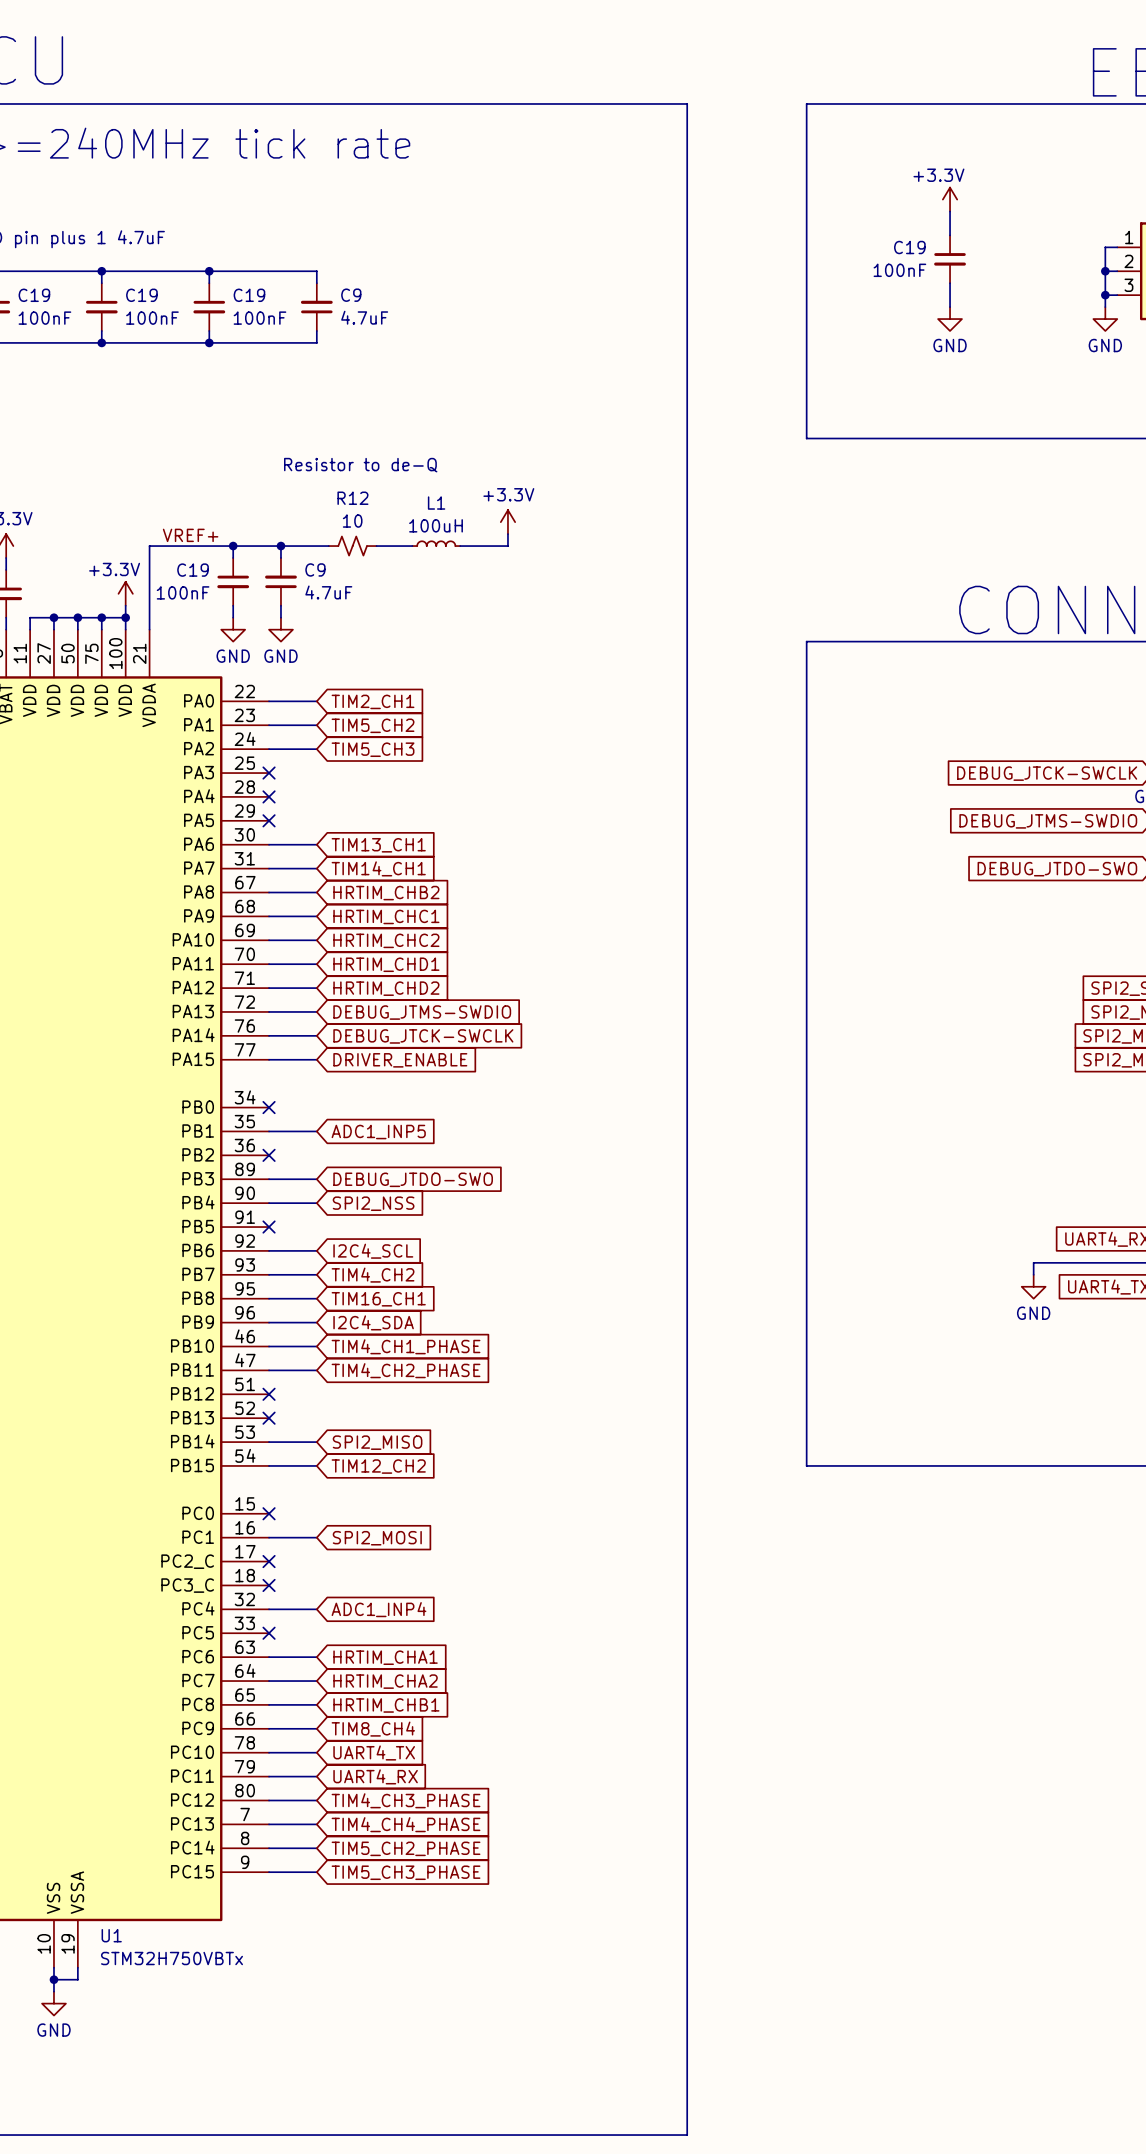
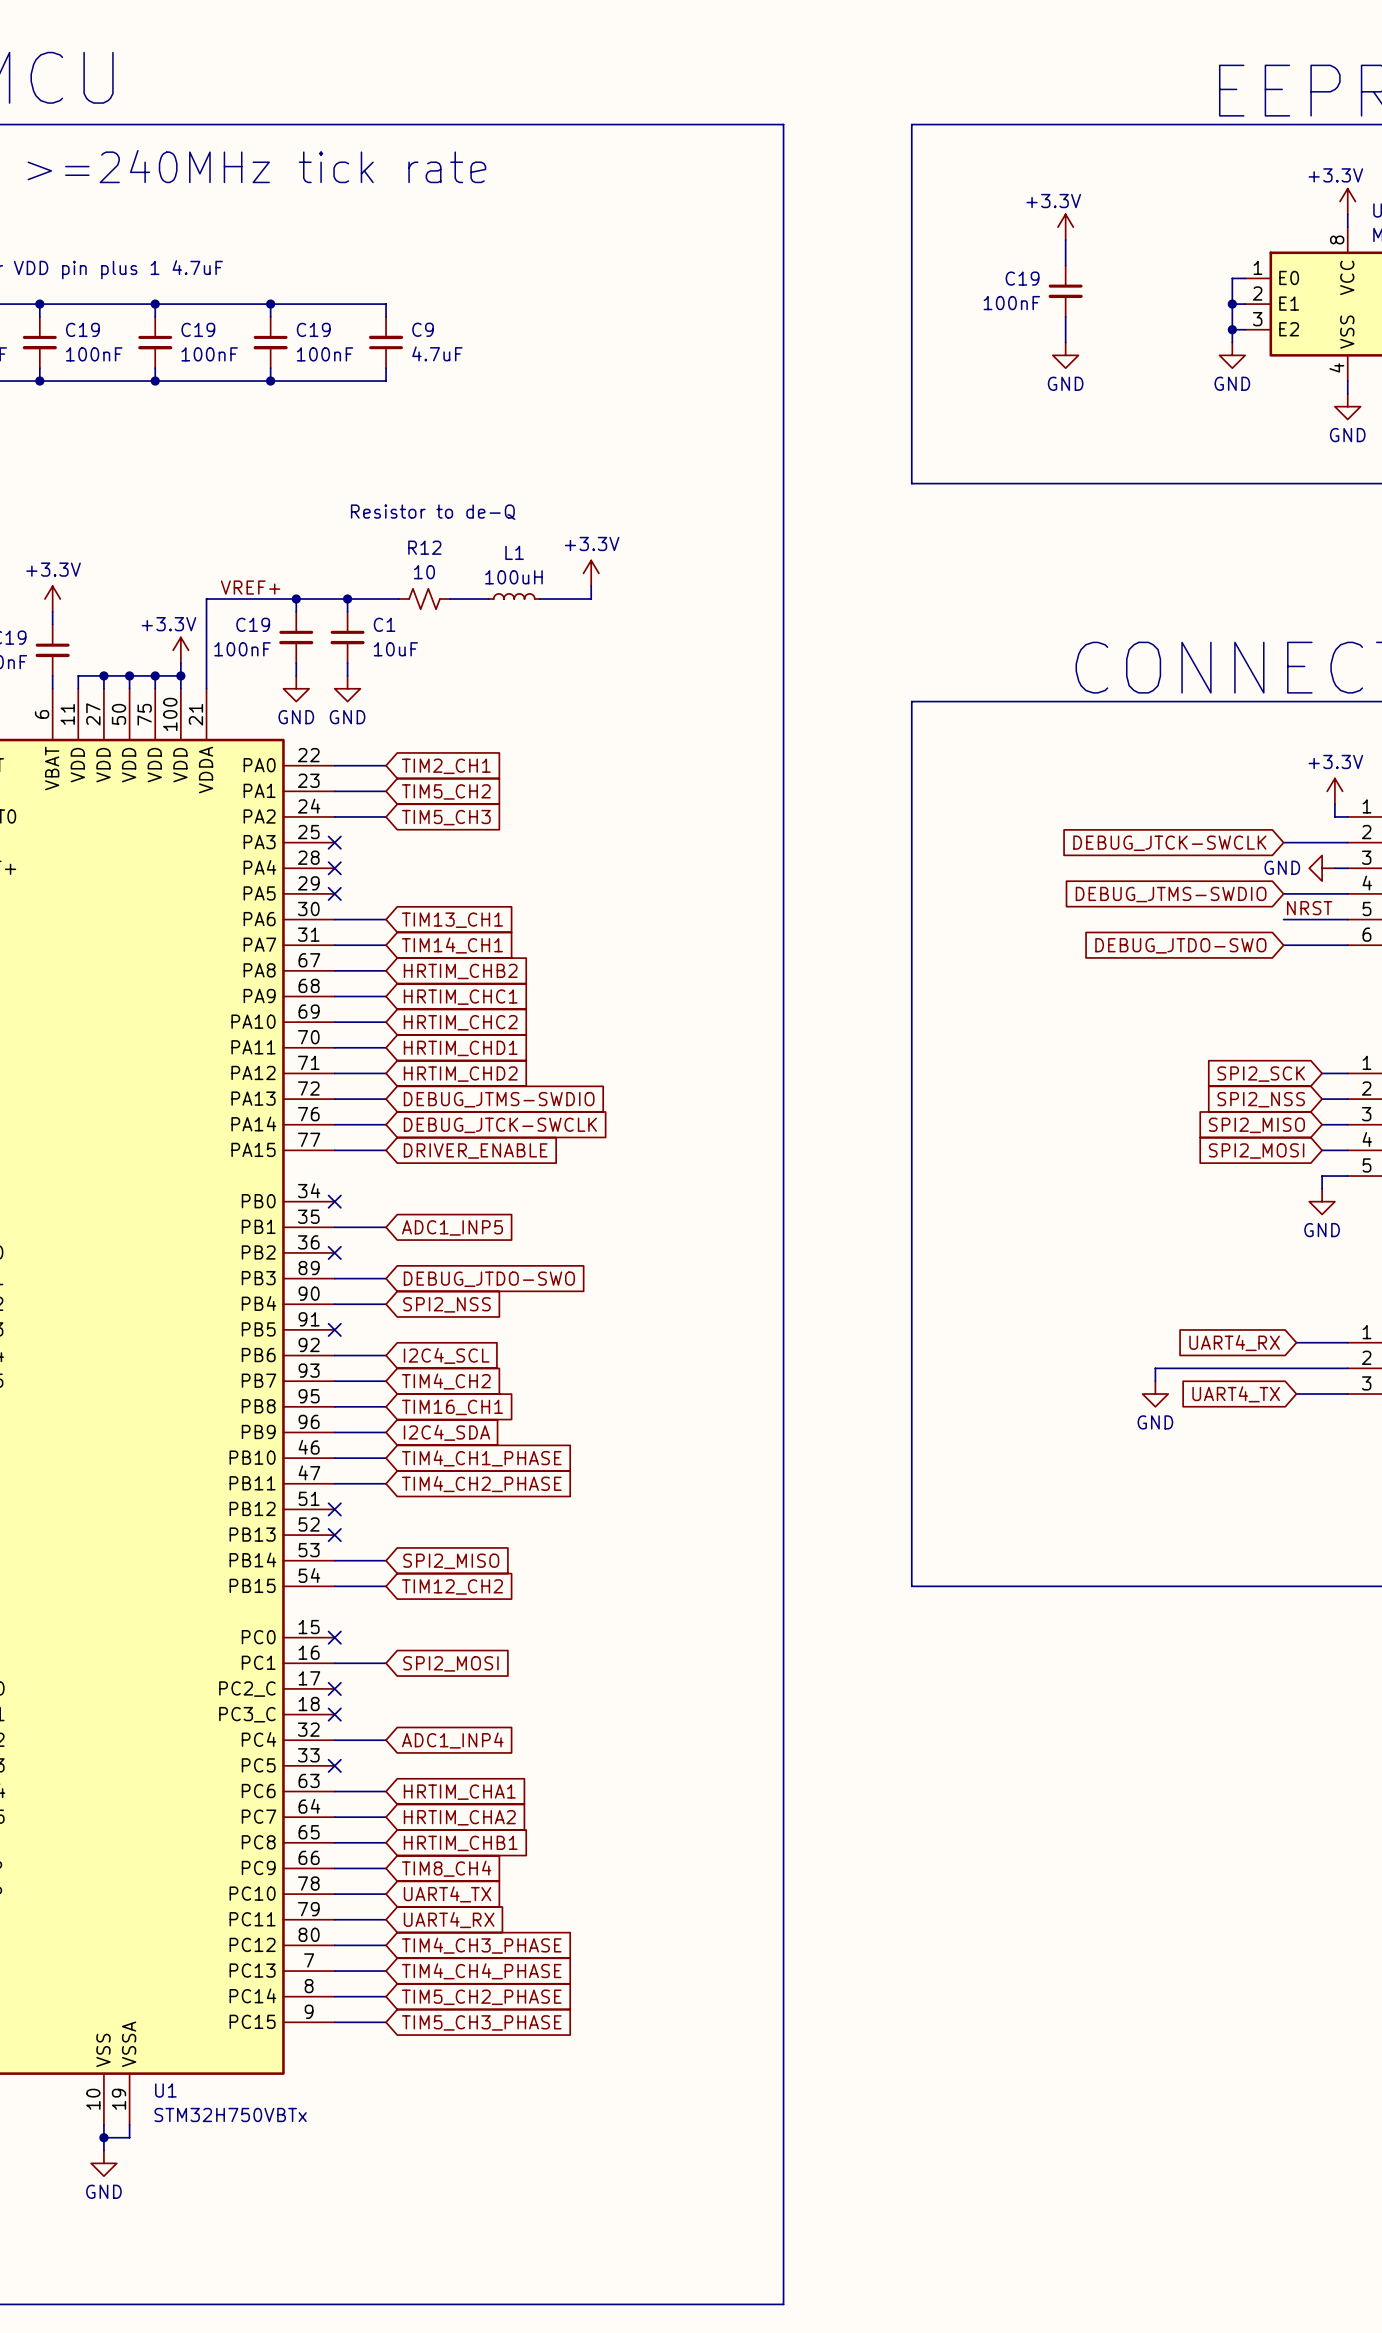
C9: 4.7uF (280, 581) -> none
C1: none -> 10uF (347, 637)

